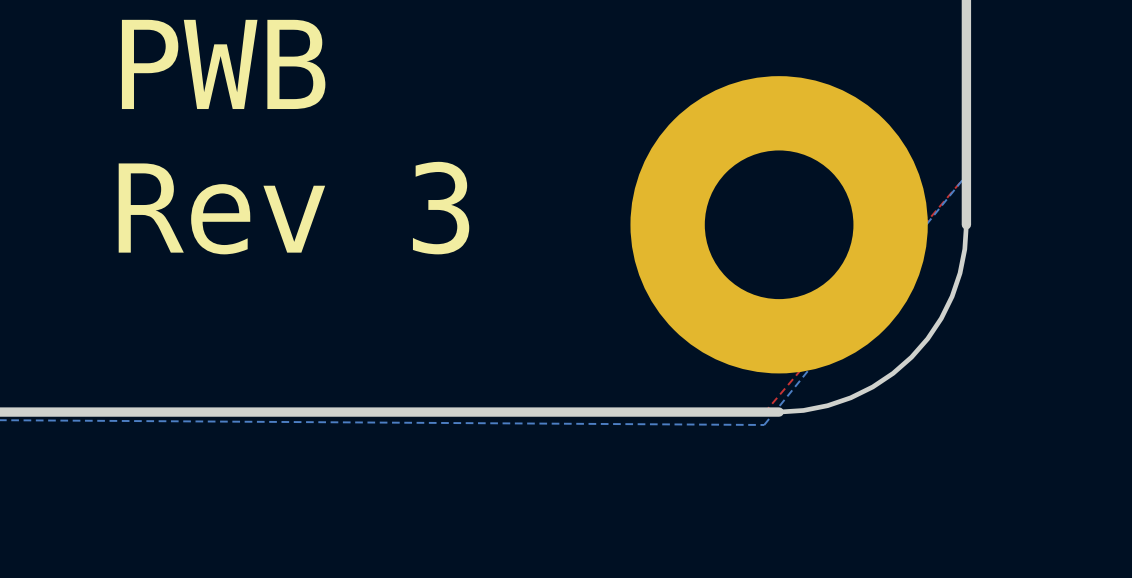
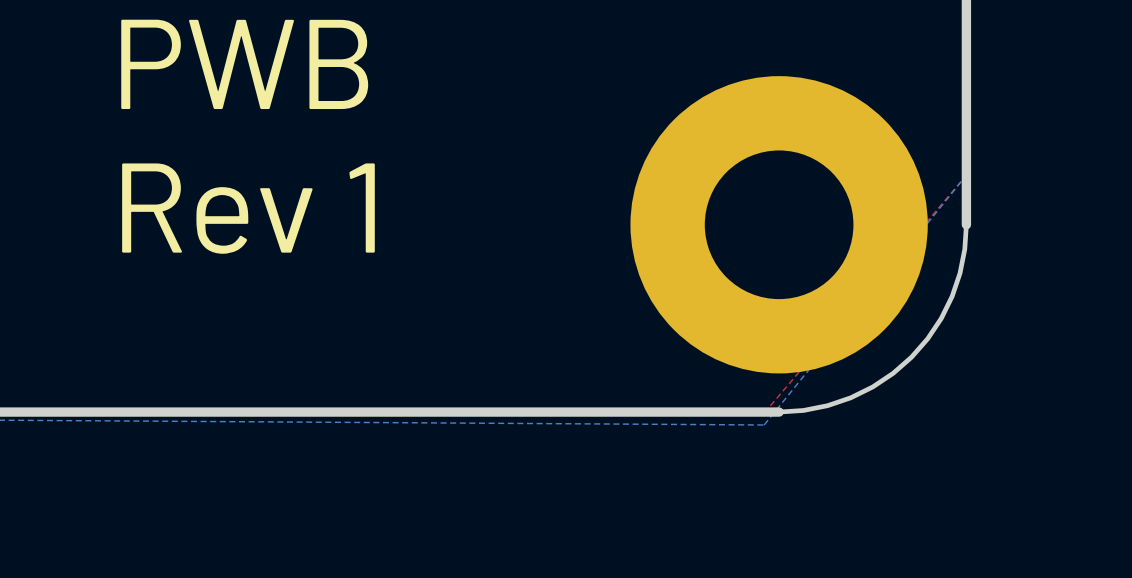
text: Rev 3 (293, 208) -> Rev 1 (248, 208)

